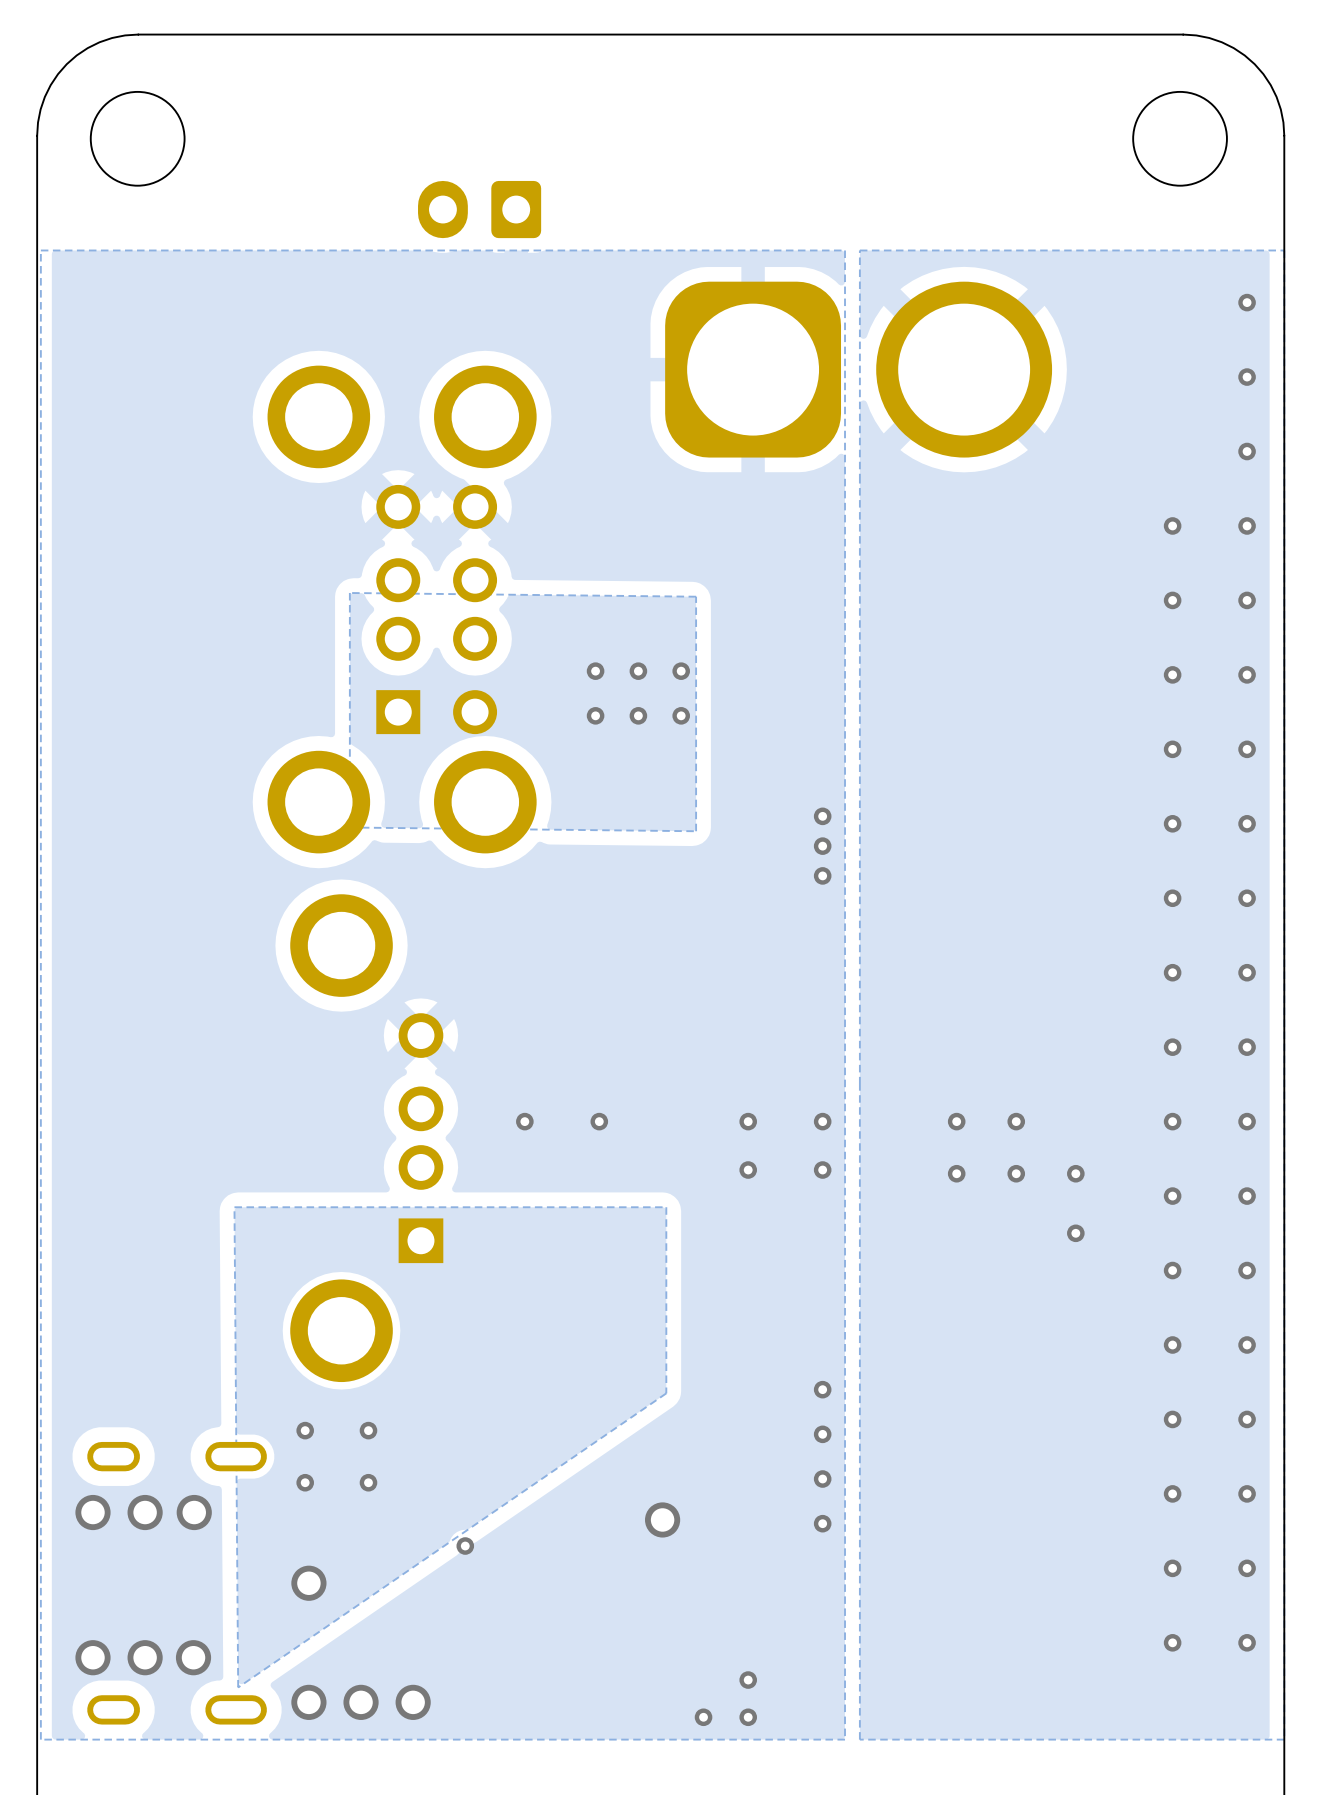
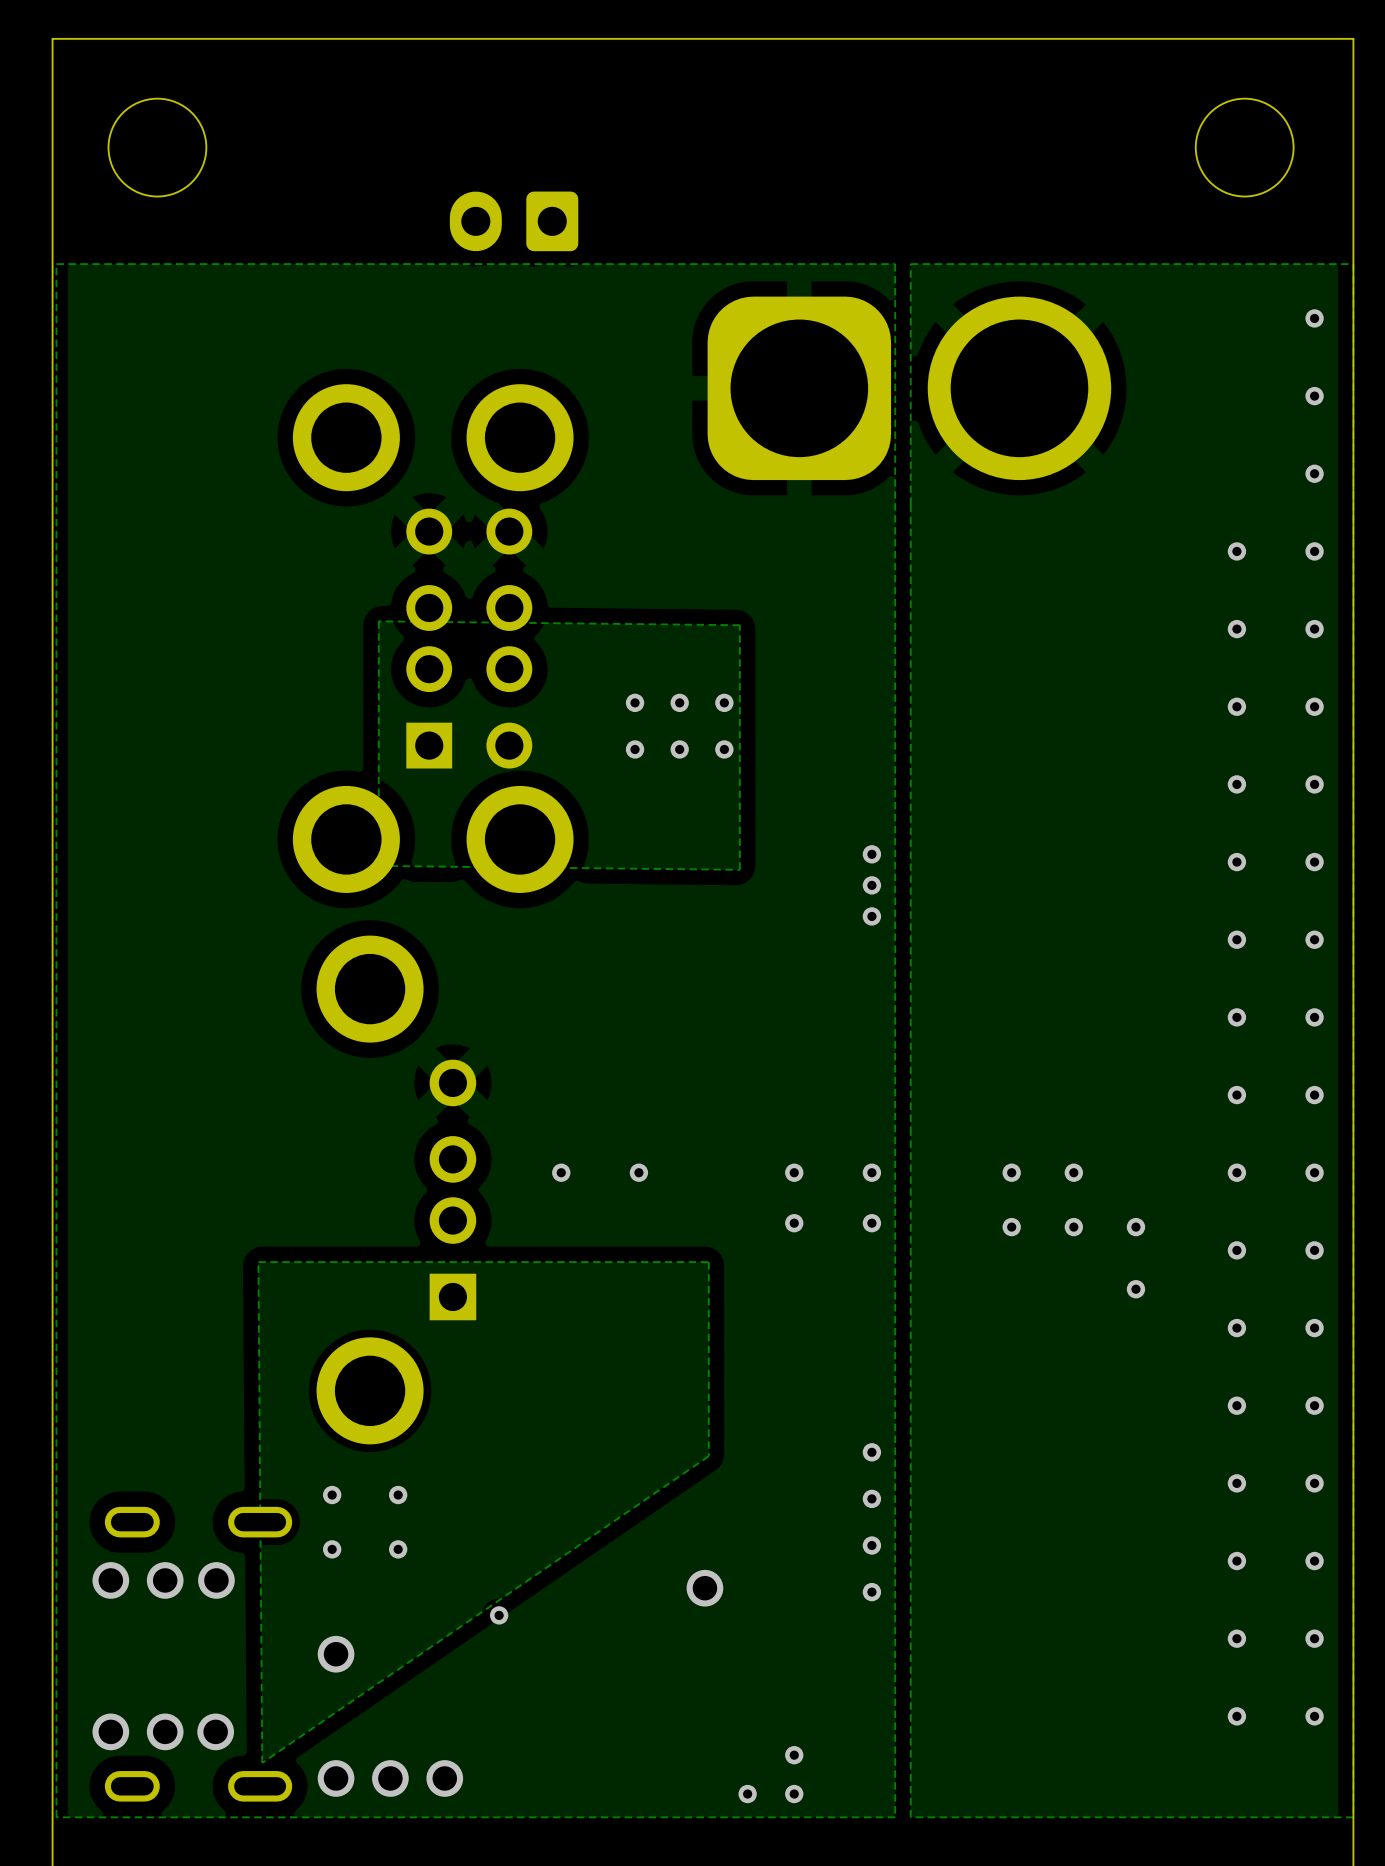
board edge: (138, 34) (125, 35) (99, 42) (76, 55) (66, 64) (50, 85) (44, 96) (40, 109) (37, 135) -> (158, 38) (52, 38) (52, 144)
board edge: (1183, 34) (1196, 35) (1221, 42) (1244, 55) (1254, 64) (1270, 85) (1276, 96) (1280, 109) (1284, 135) -> (1247, 38) (1353, 38) (1353, 144)

